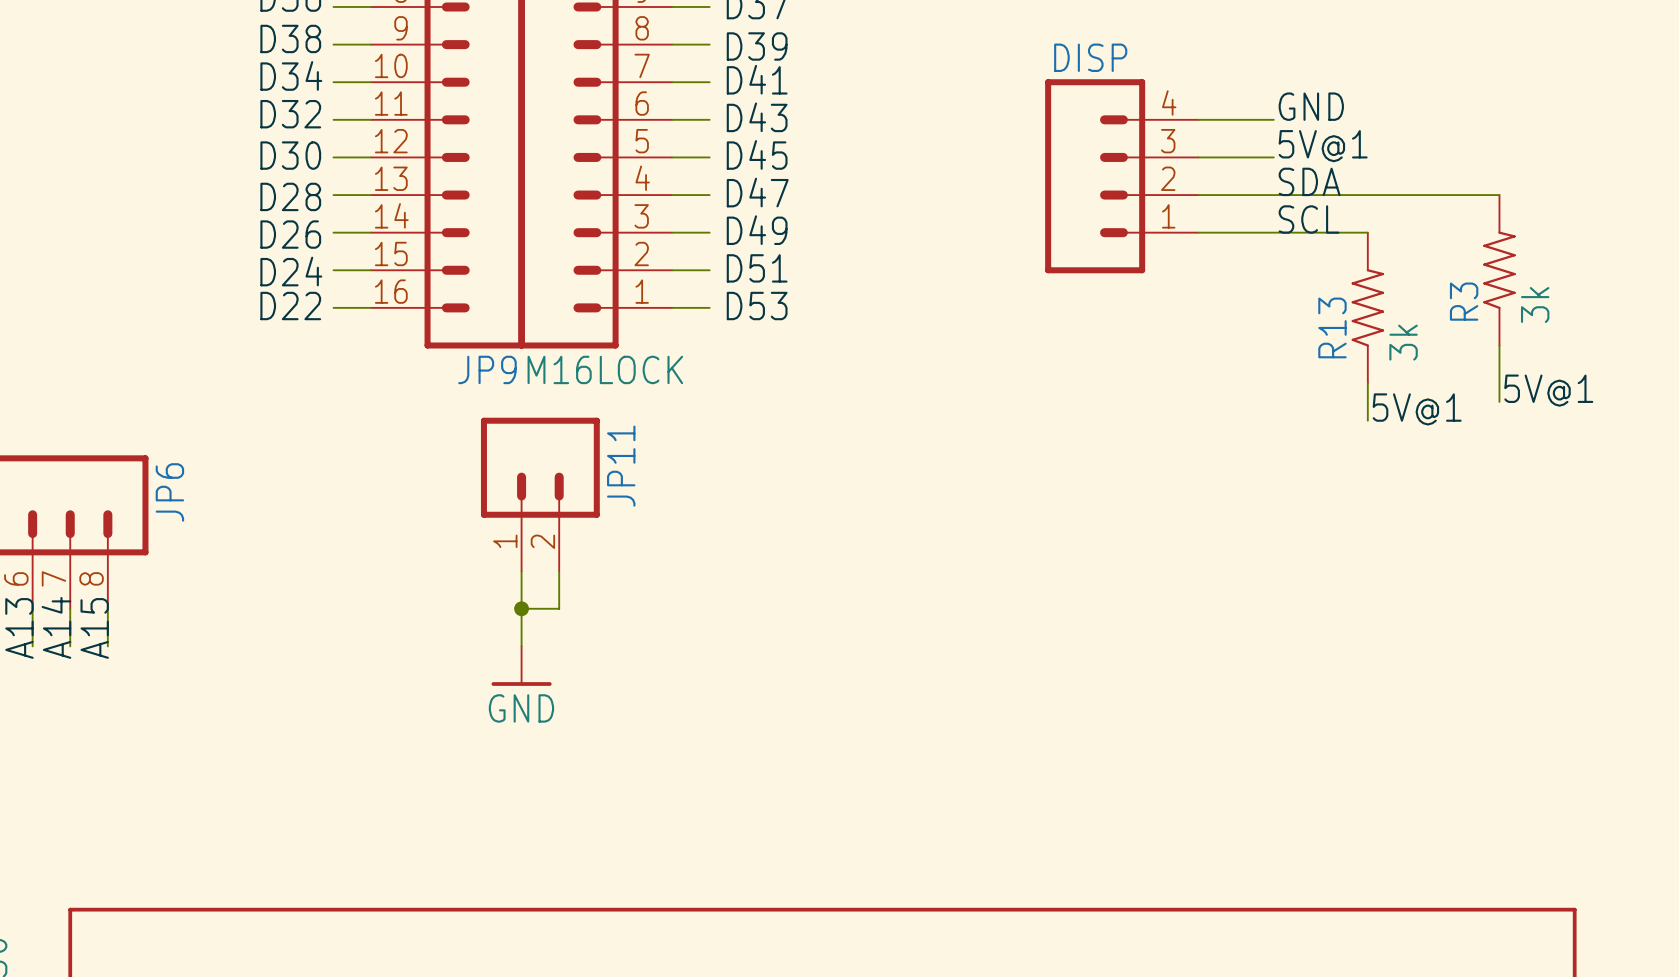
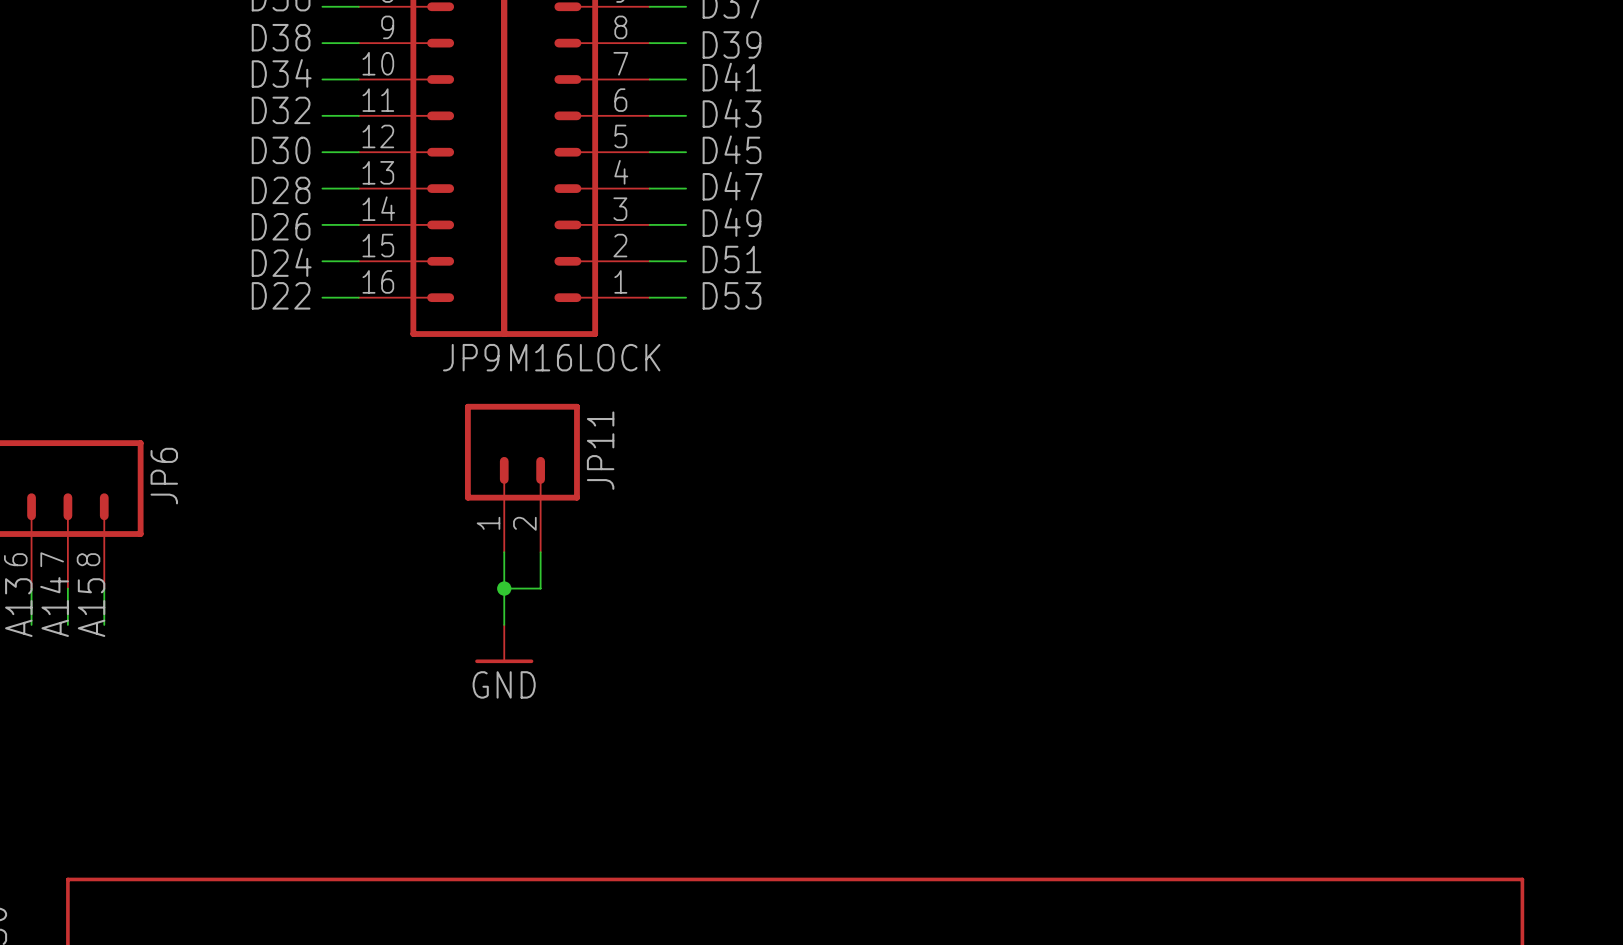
label: GND (1311, 106) -> none
wire: (1198, 119) (1273, 119) -> none
label: 5V@1 (1323, 146) -> none
wire: (1198, 157) (1273, 157) -> none
DISP: (1121, 176) -> none
label: SDA (1309, 181) -> none
wire: (1198, 195) (1499, 195) -> none
label: SCL (1309, 219) -> none
wire: (1198, 232) (1367, 232) -> none
R3: 3k (1499, 270) -> none
R13: 3k (1367, 307) -> none
wire: (1499, 345) (1499, 401) -> none
wire: (1367, 383) (1367, 420) -> none
label: 5V@1 (1548, 390) -> none
label: 5V@1 (1417, 409) -> none

